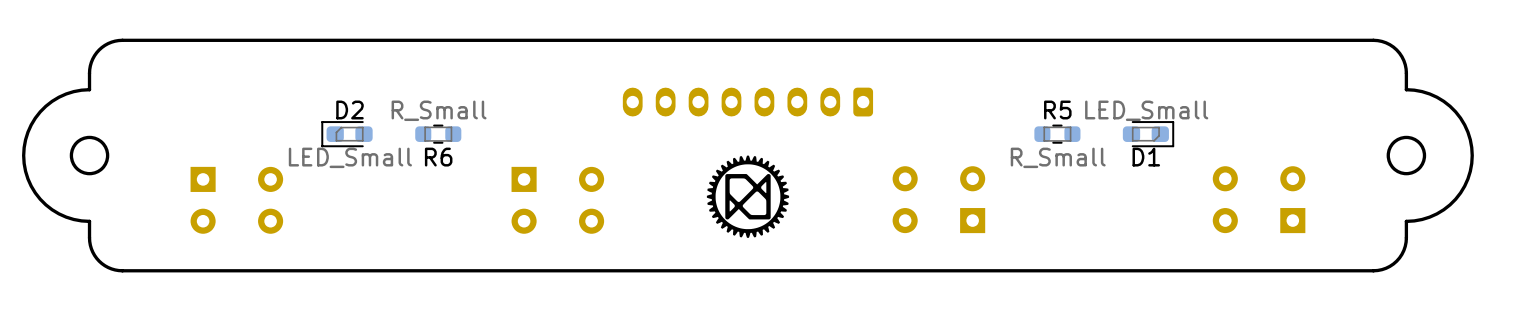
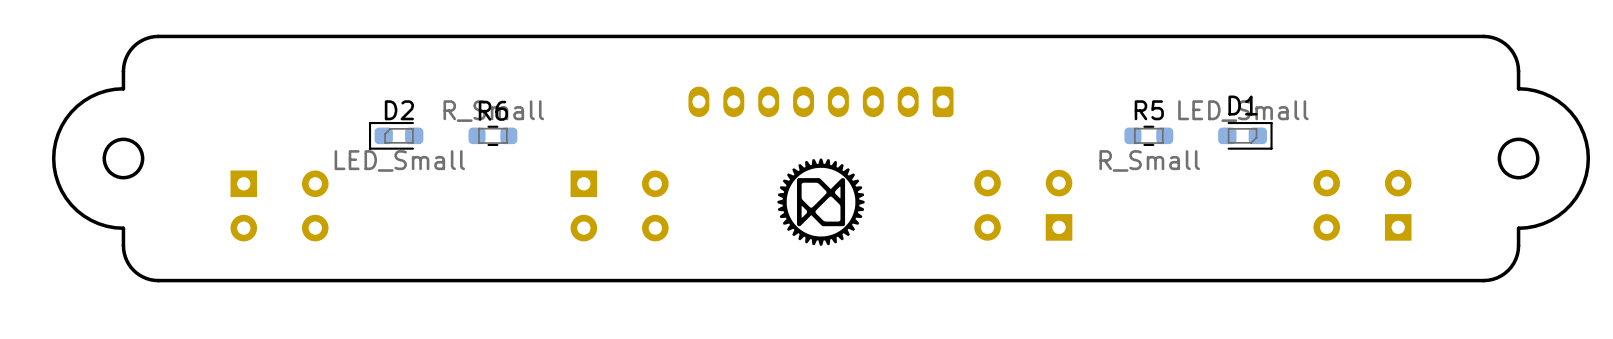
R6 name position: R6 (438, 157) -> R6 (493, 110)
D1 name position: D1 (1146, 157) -> D1 (1243, 105)

